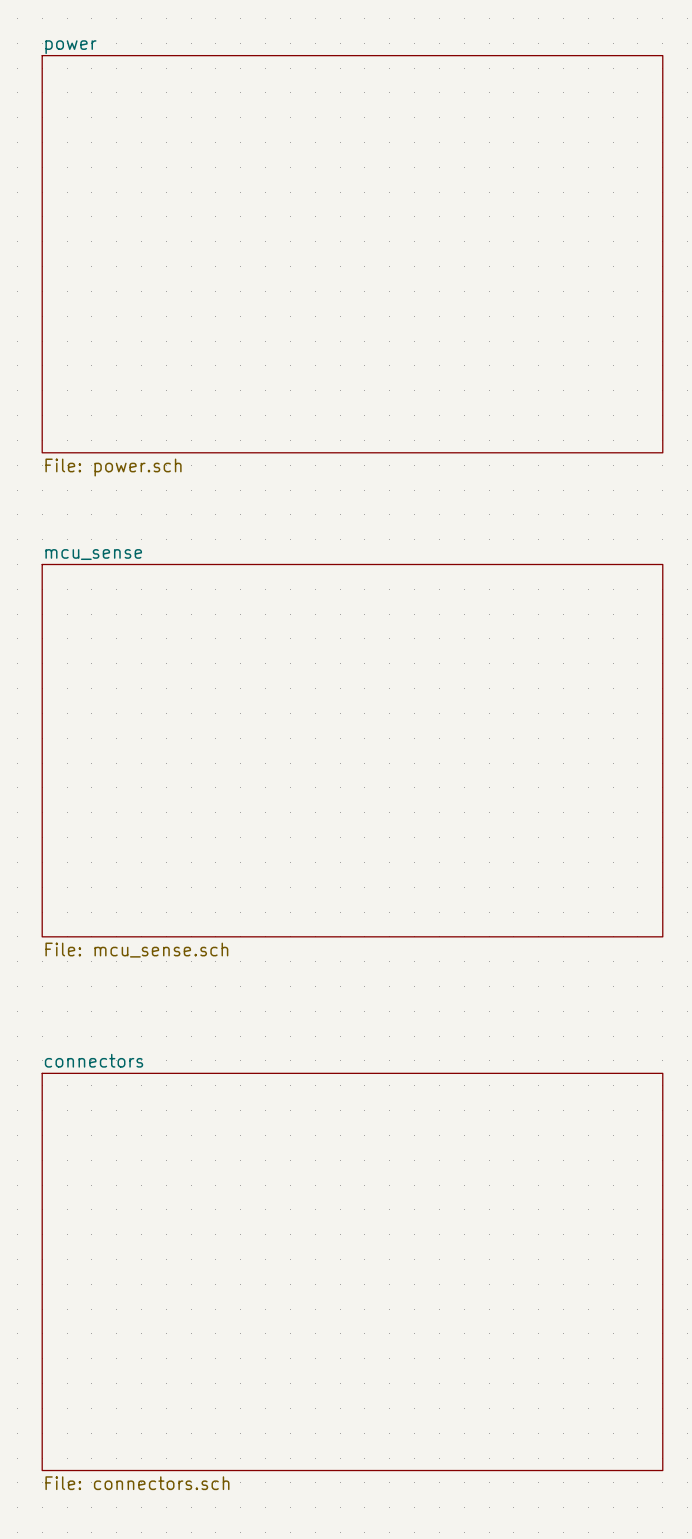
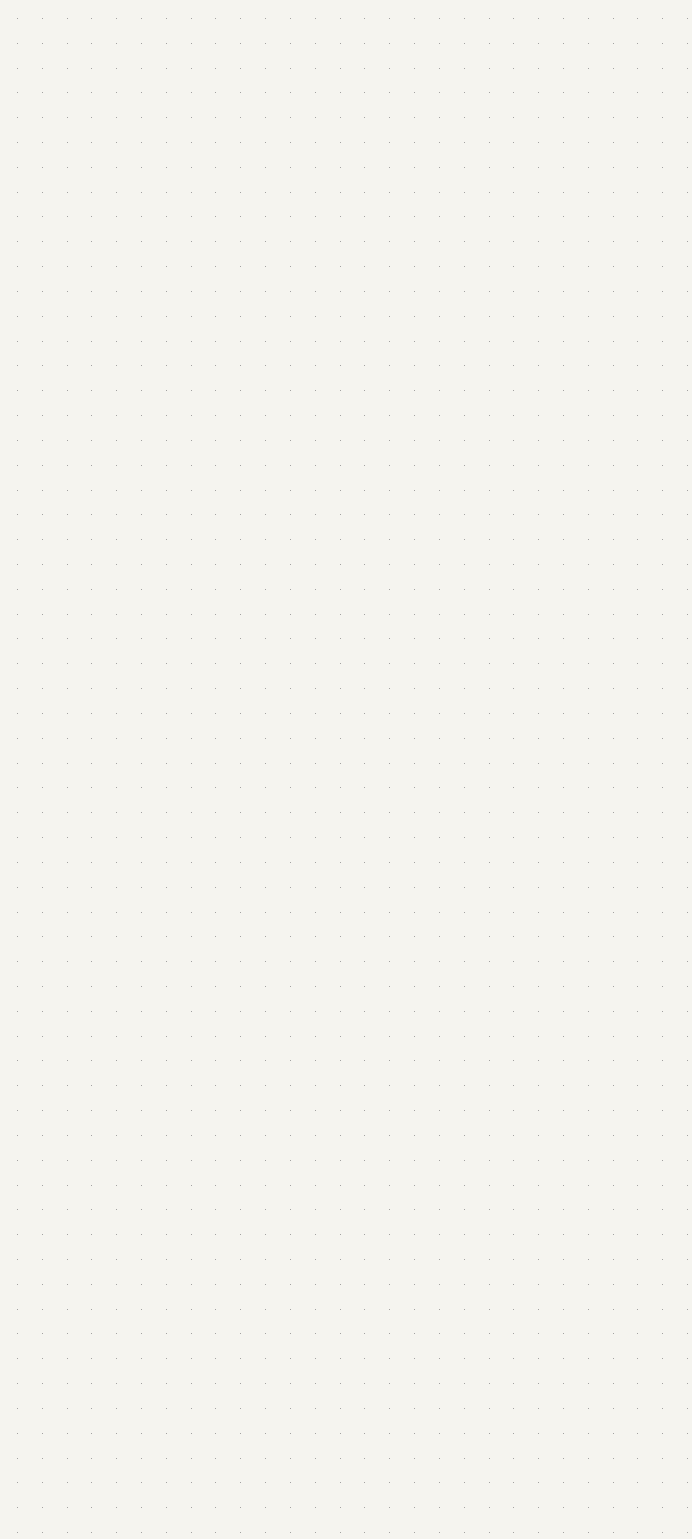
sheet power: File: power.sch (352, 254) -> none
sheet mcu_sense: File: mcu_sense.sch (352, 750) -> none
sheet connectors: File: connectors.sch (352, 1271) -> none

